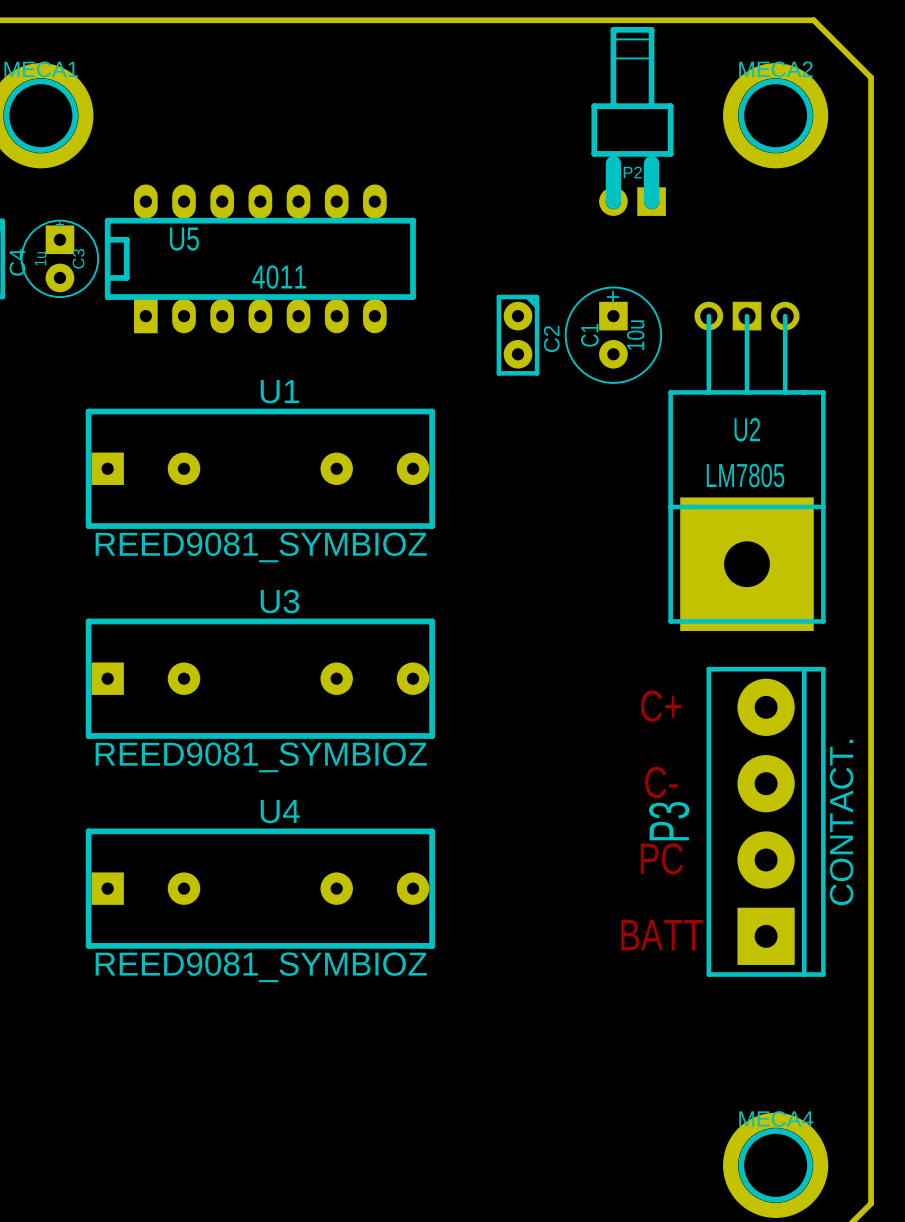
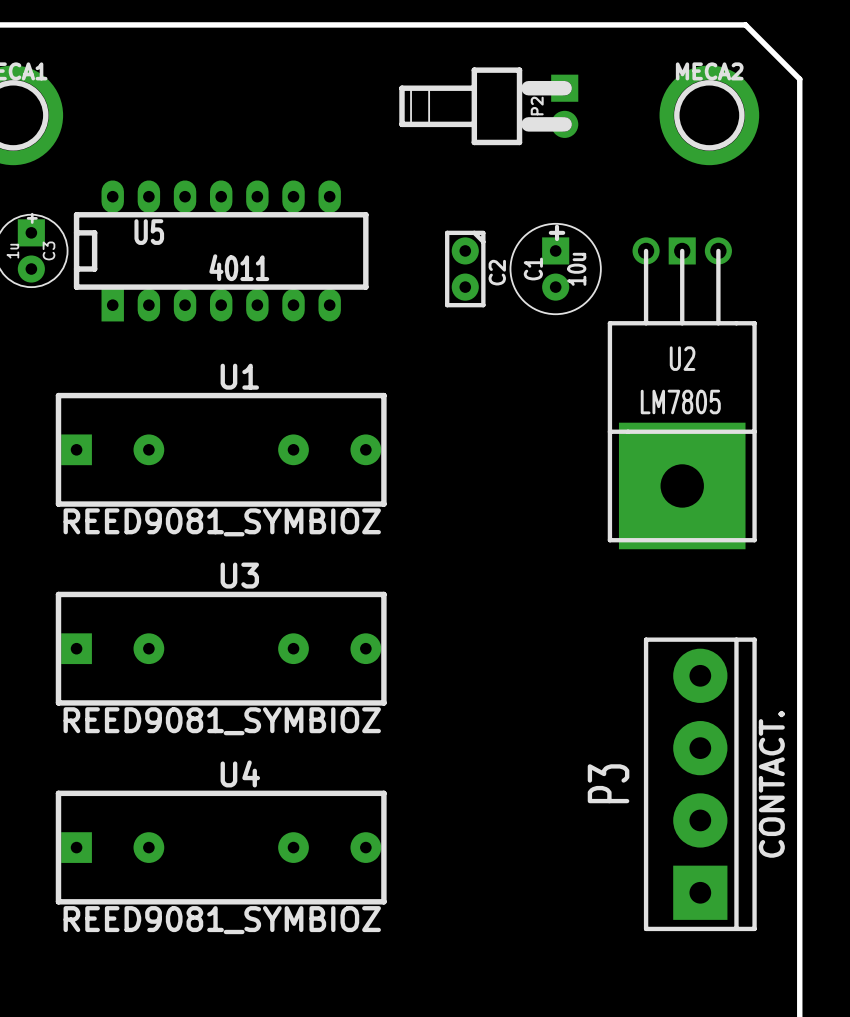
P2 rotation: 0° (632, 121) -> 90° counterclockwise (488, 106)
C2 position: (517, 335) -> (465, 269)
C1 position: (613, 335) -> (555, 269)
U2 position: (746, 466) -> (682, 393)
text: C+ (661, 706) -> none
text: C- (661, 782) -> none
text: PC (661, 858) -> none
text: BATT (662, 935) -> none

